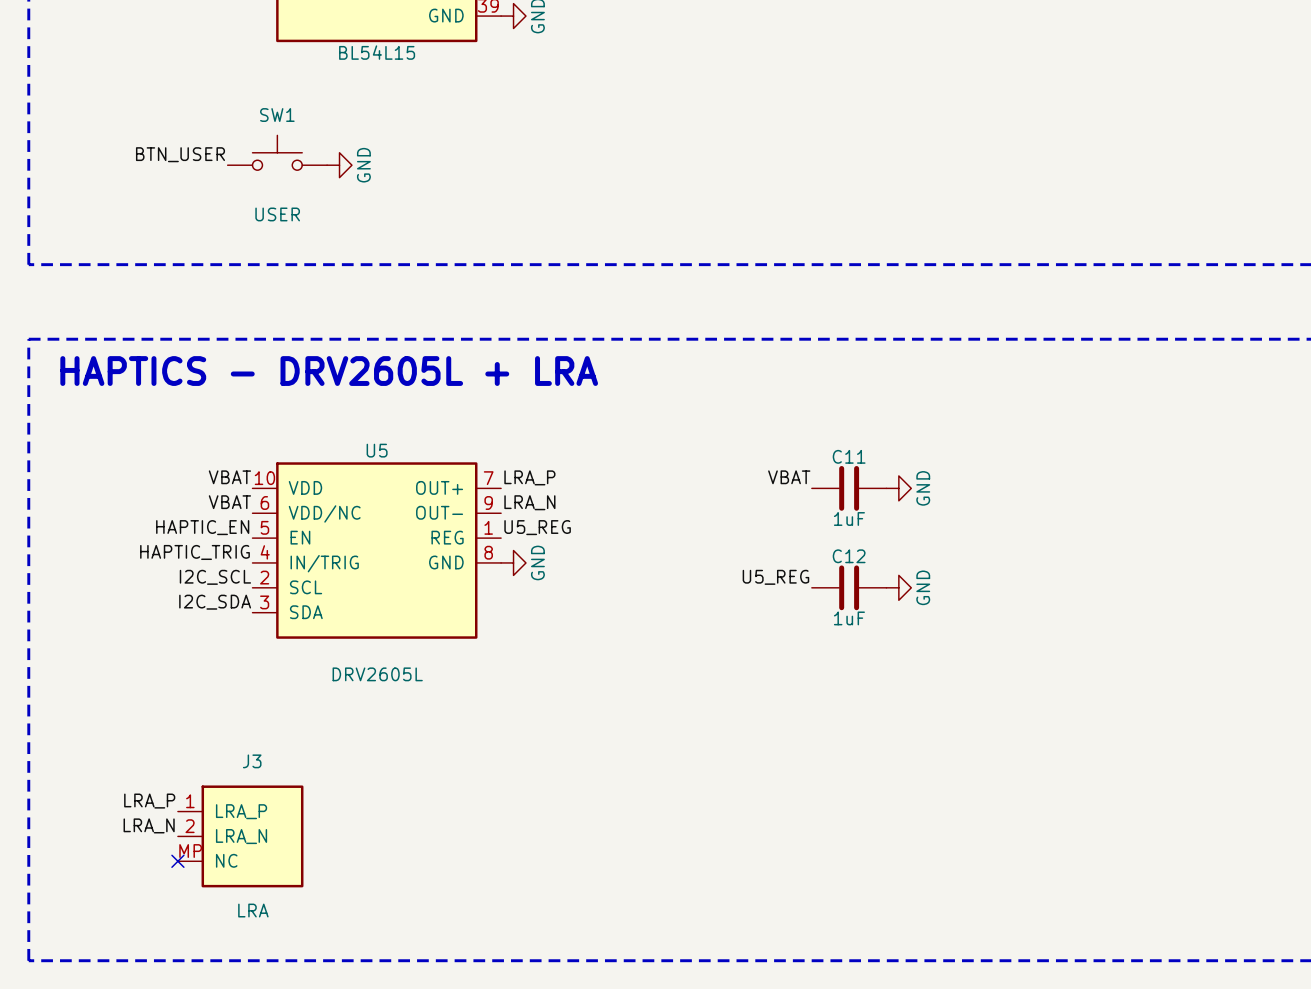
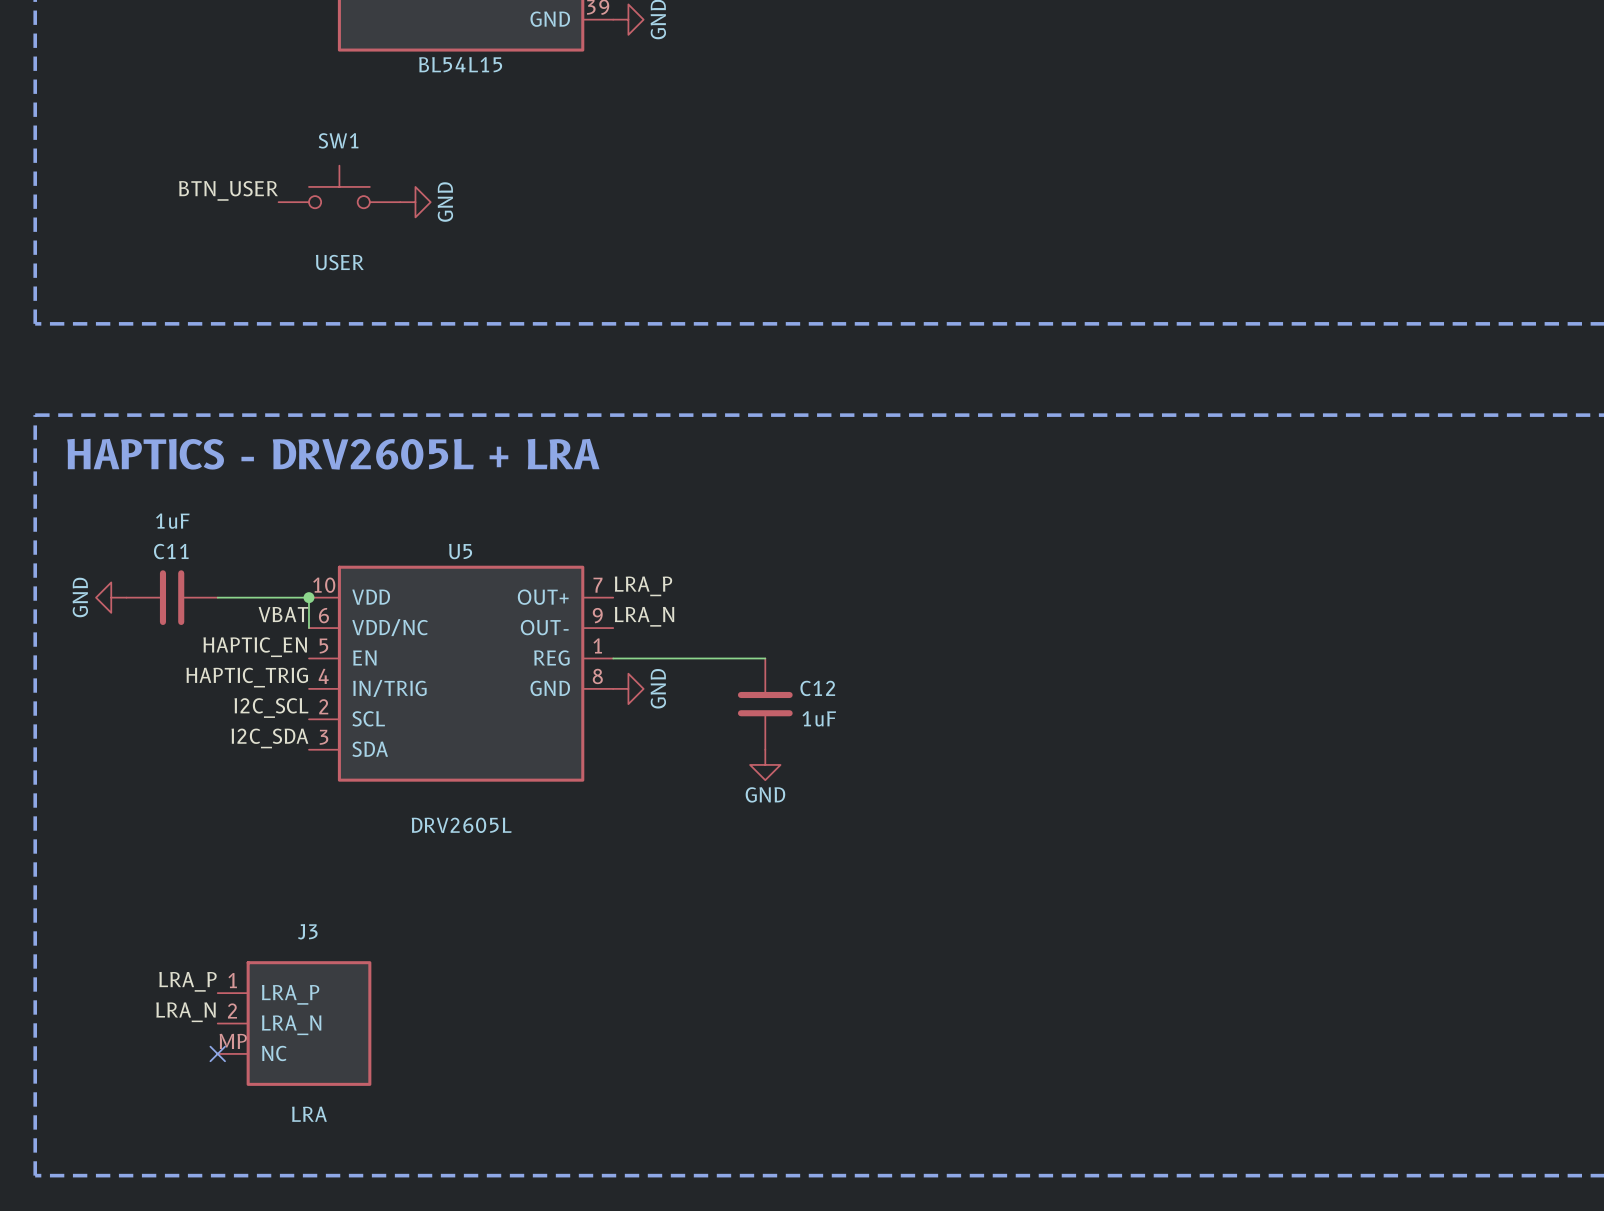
C11 name position: C11 (849, 456) -> C11 (171, 551)
label: VBAT (229, 477) -> none
label: VBAT (789, 477) -> none
power symbol: none -> GND (111, 597)
wire: none -> (217, 597) (308, 597) (308, 628)
junction: none -> (308, 597)
C11 position: (849, 488) -> (172, 597)
power symbol: GND (898, 488) -> none
C11 value position: 1uF (849, 518) -> 1uF (172, 521)
label: U5_REG (537, 527) -> none
wire: none -> (613, 658) (765, 658)
label: U5_REG (775, 577) -> none
C12 rotation: 0° (849, 587) -> 90° clockwise (765, 704)
C12 position: (849, 587) -> (765, 704)
power symbol: GND (898, 587) -> none
C12 value position: 1uF (849, 618) -> 1uF (819, 718)
power symbol: none -> GND (765, 764)

